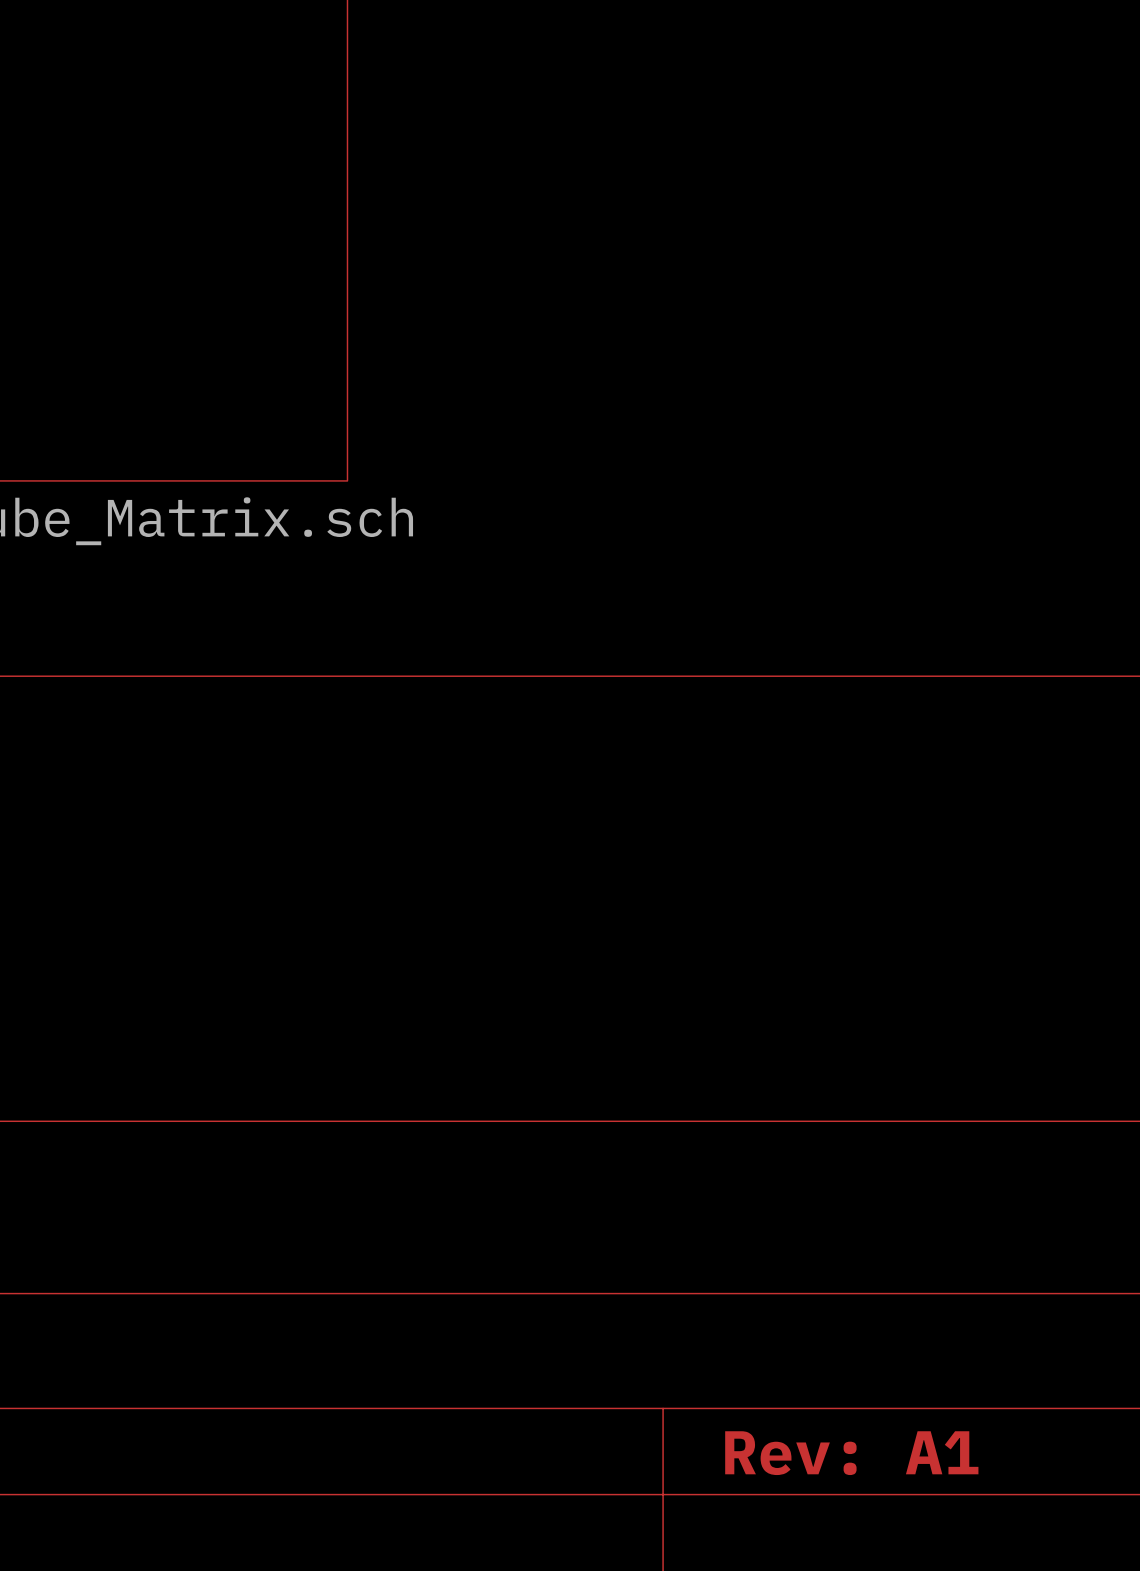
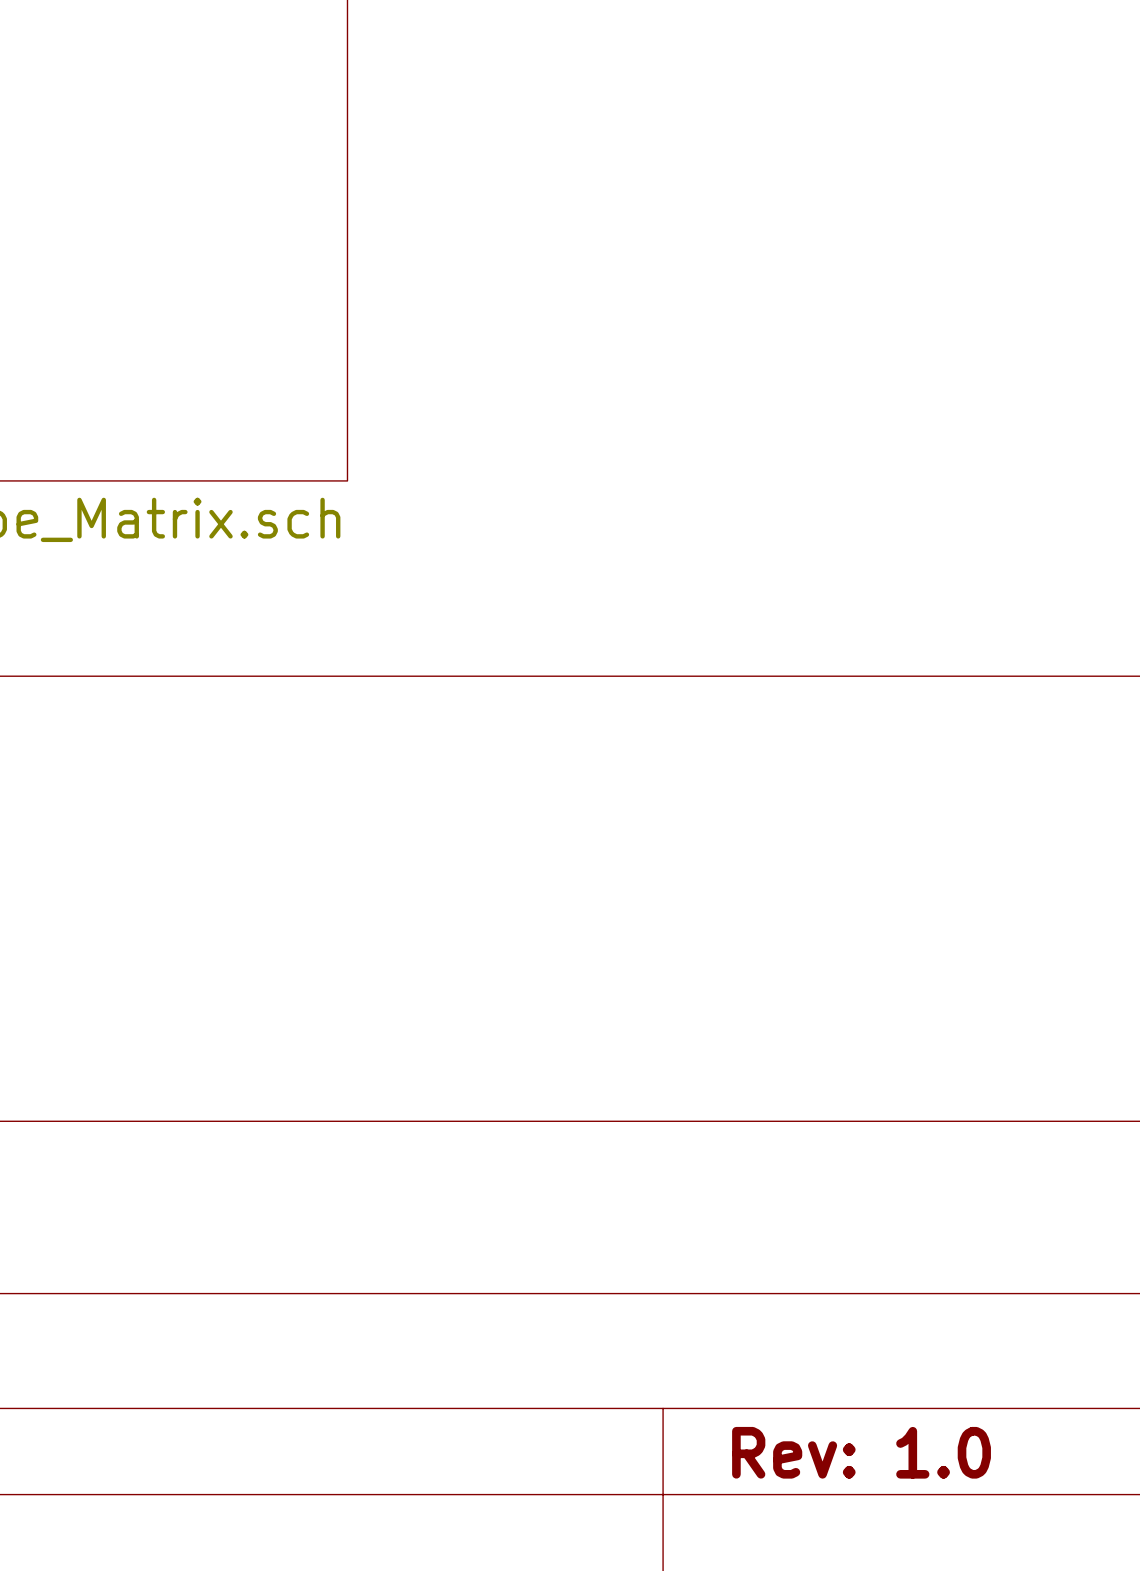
title block: Rev: A1 (851, 1453) -> Rev: 1.0 (861, 1452)

